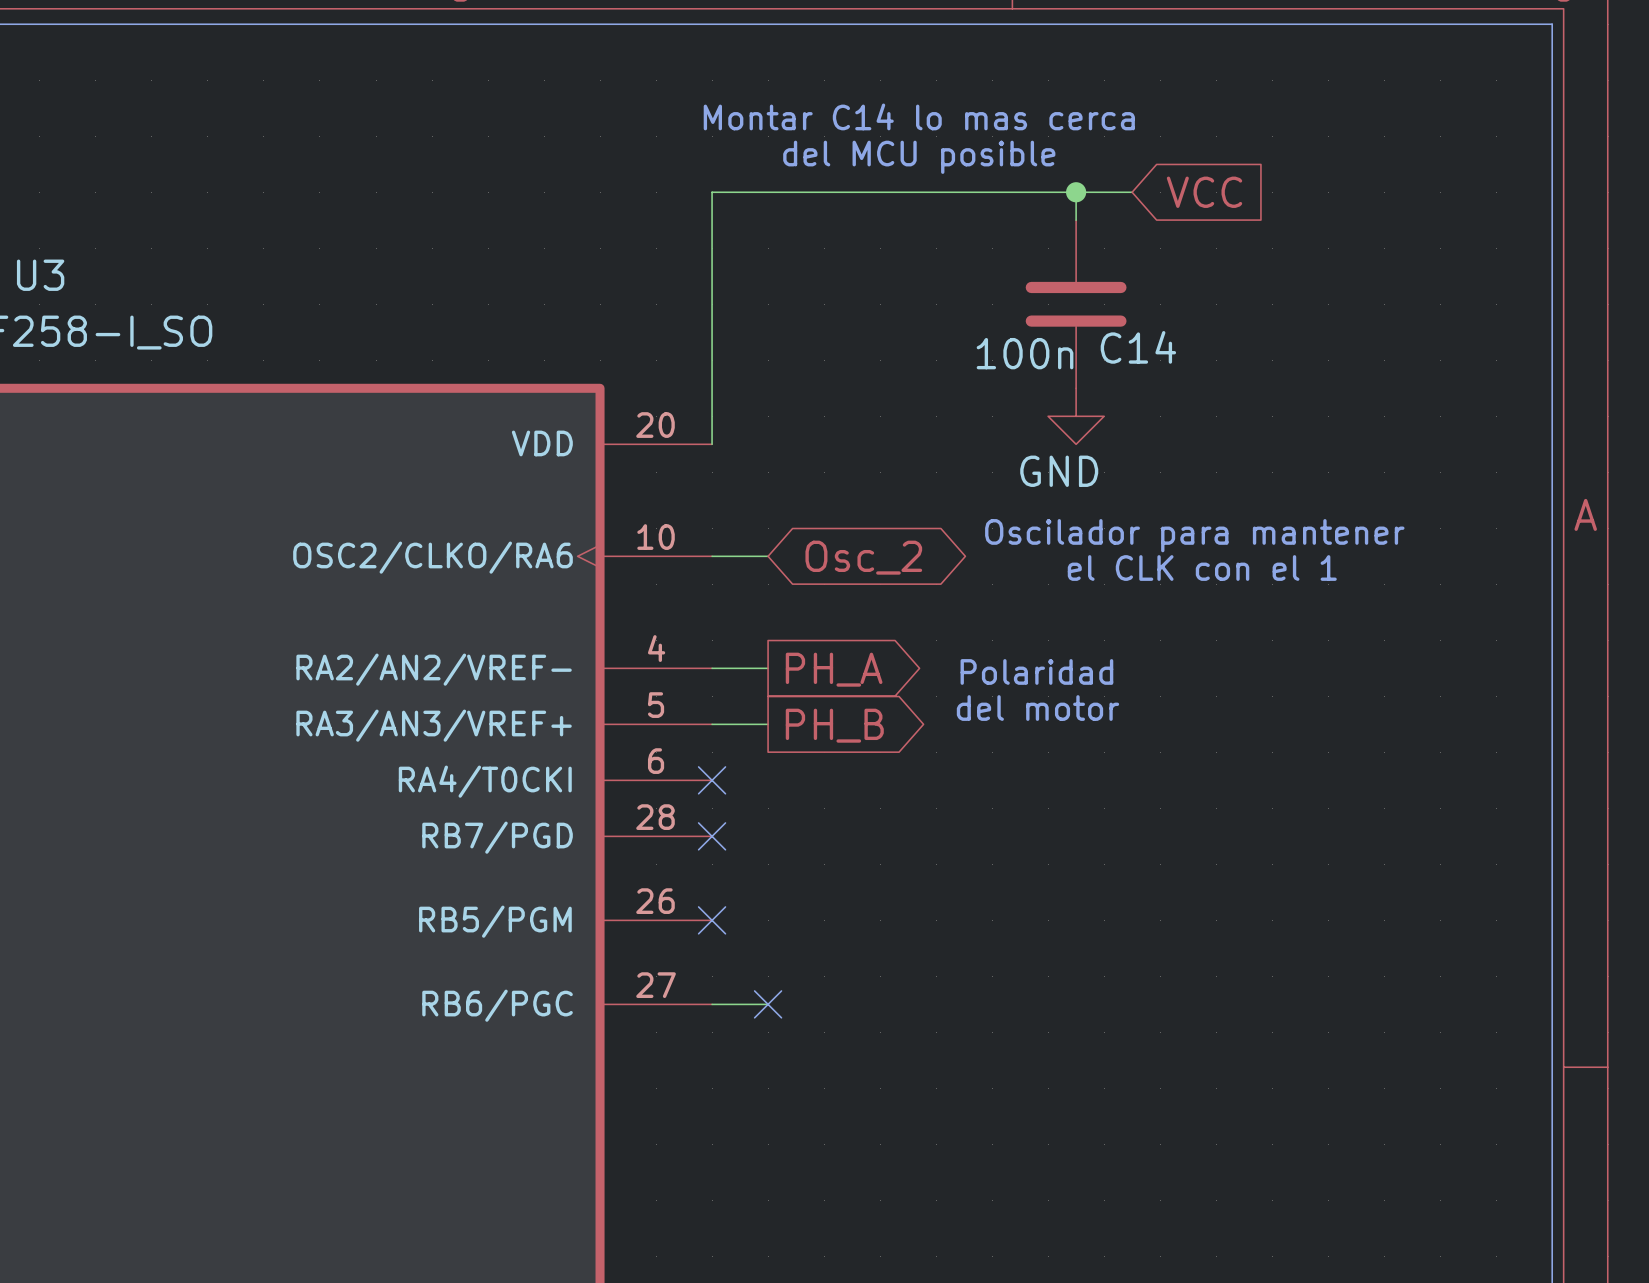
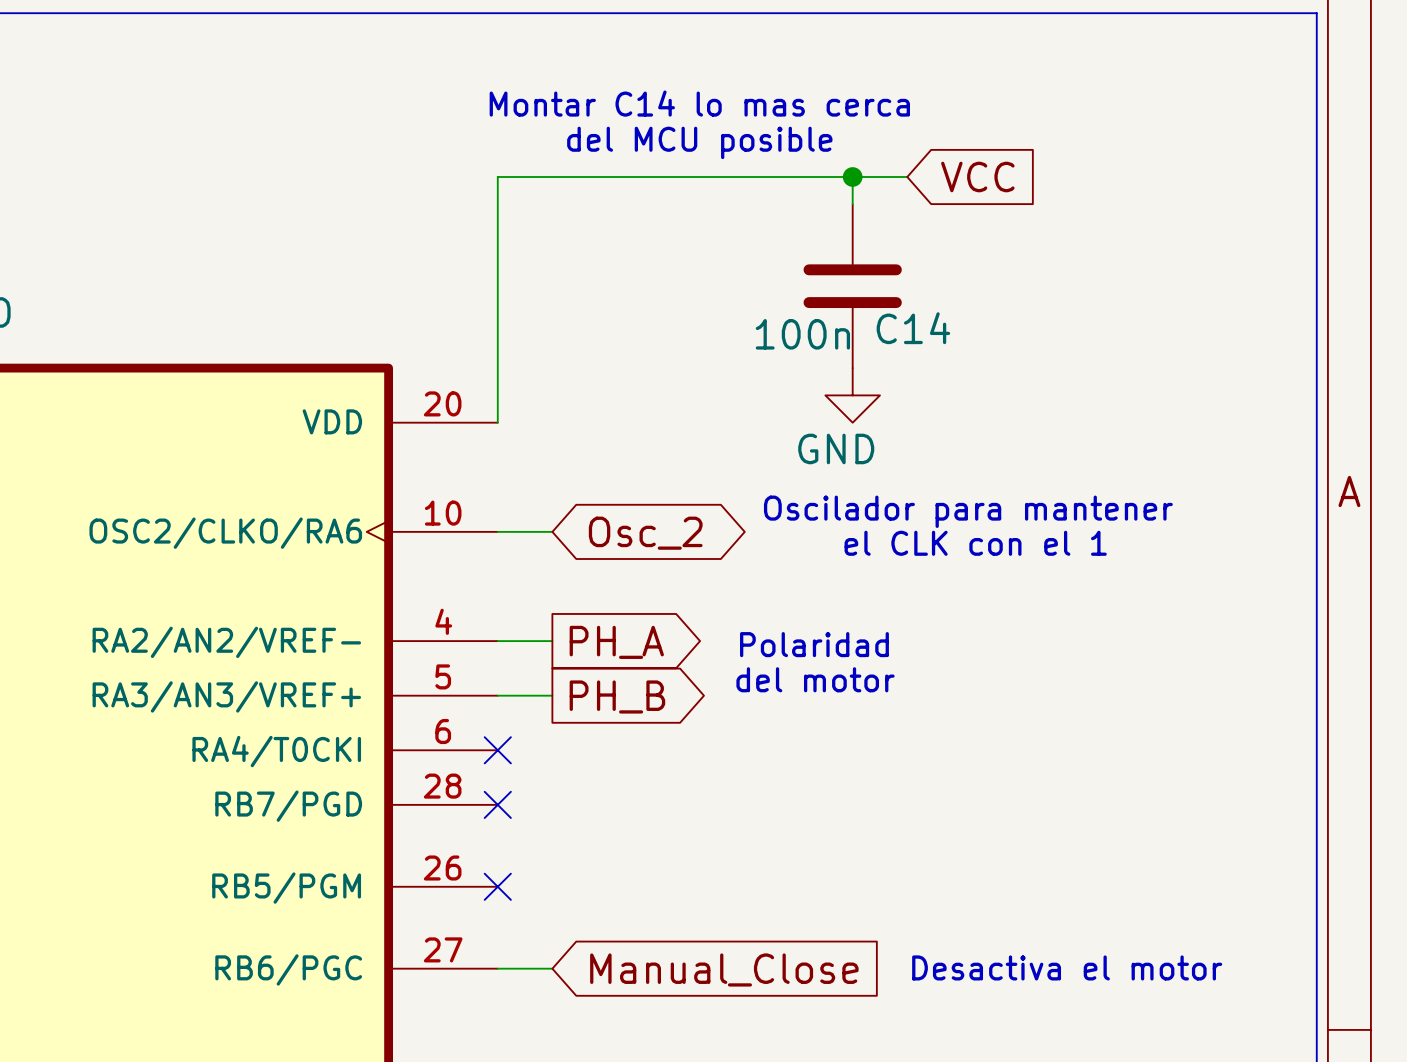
text: none -> Desactiva el motor (1067, 967)
no-connect mark: (768, 1004) -> none
global label: none -> Manual_Close (724, 969)

